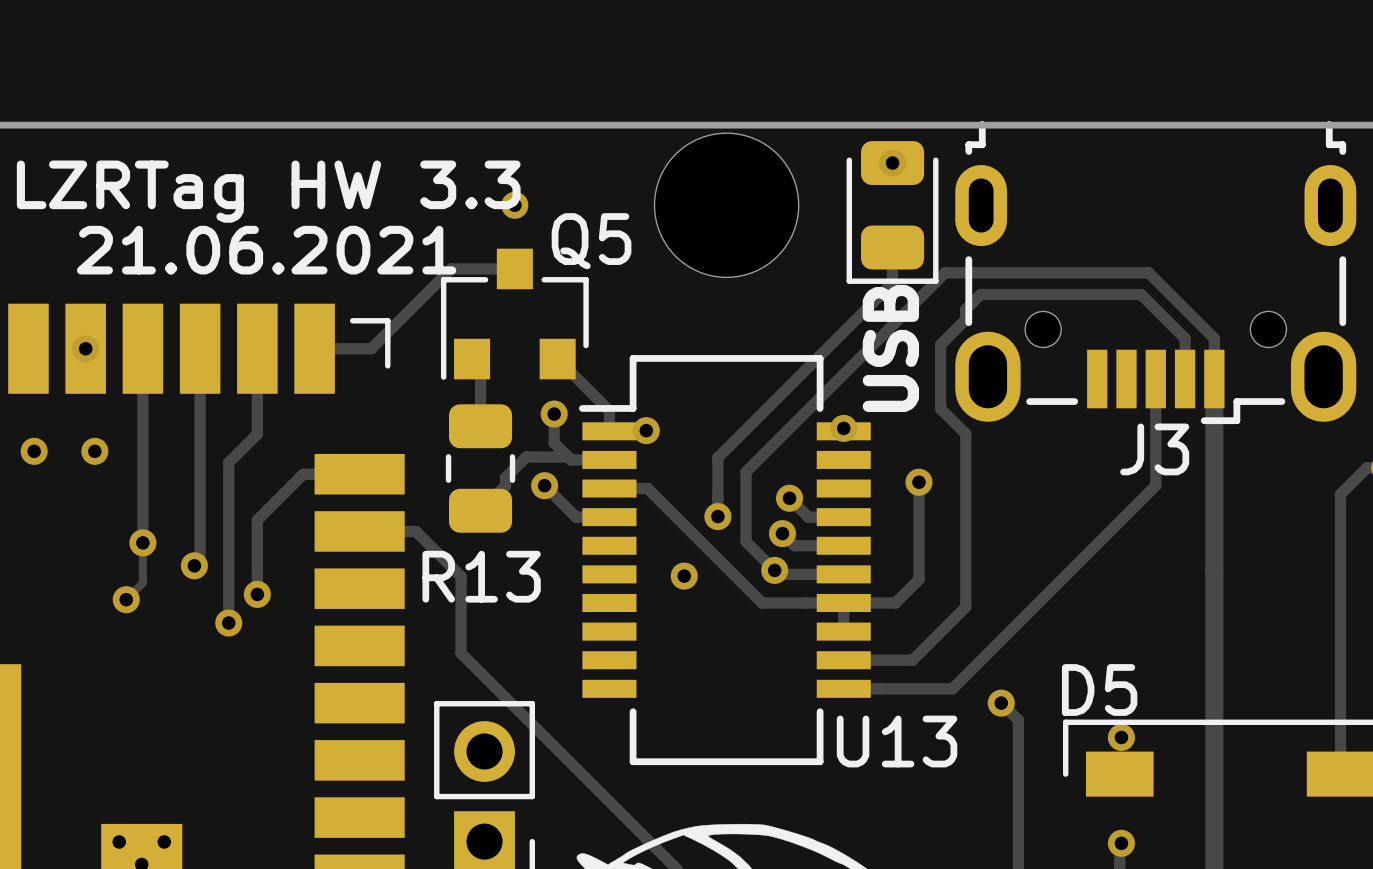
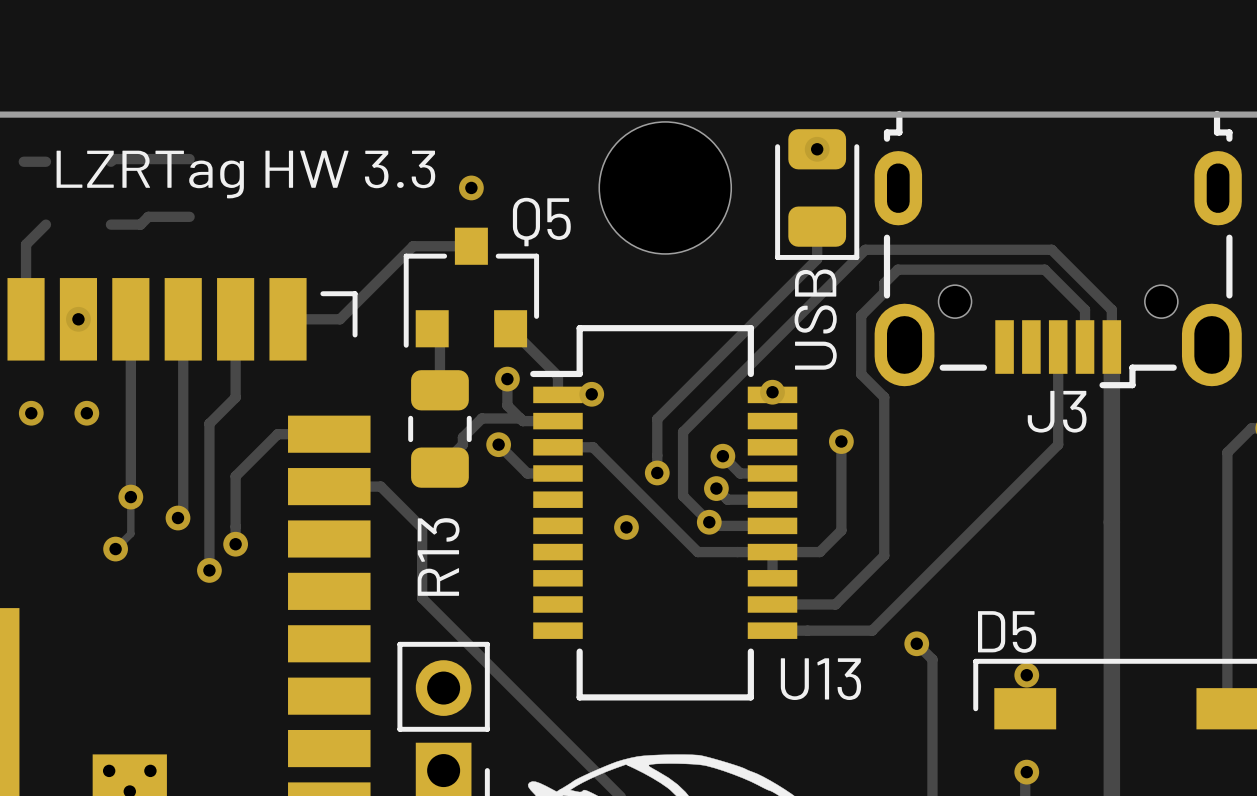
track: none -> (189, 159) (113, 159) (110, 161)
track: none -> (23, 161) (45, 161)
track: none -> (189, 216) (148, 216) (140, 224) (110, 224)
track: none -> (45, 224) (26, 244) (26, 319)
text: 21.06.2021 (266, 250) -> none
R13 name rotation: 0° (481, 576) -> 90° counterclockwise (438, 556)

